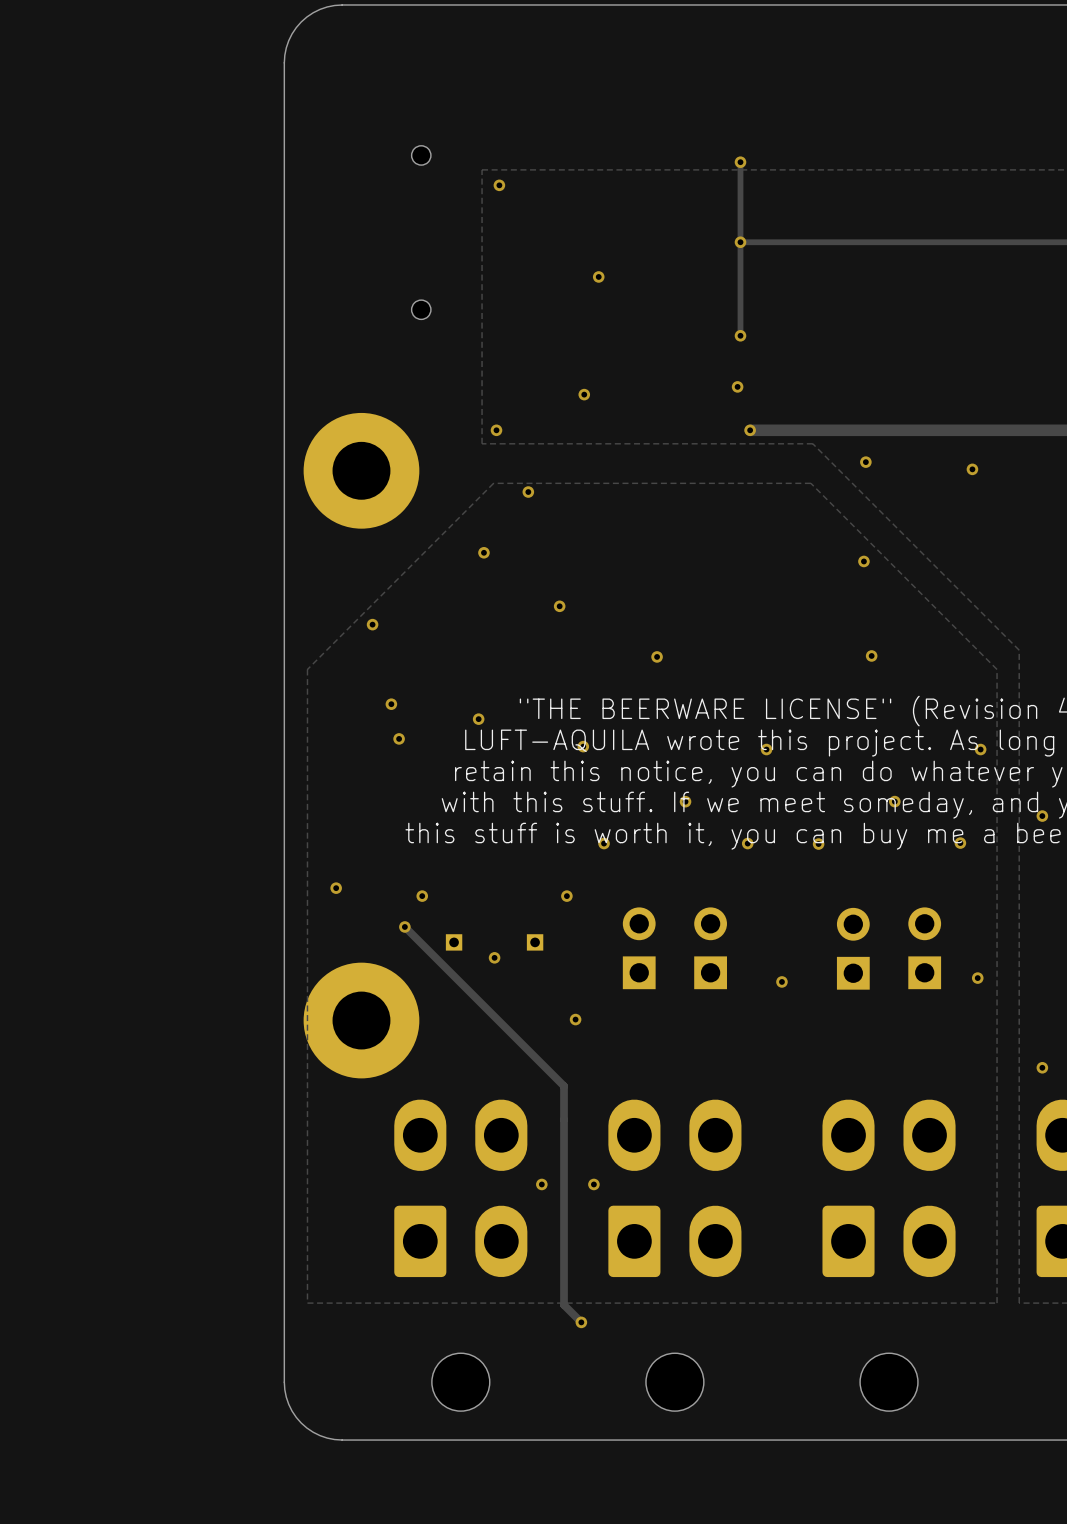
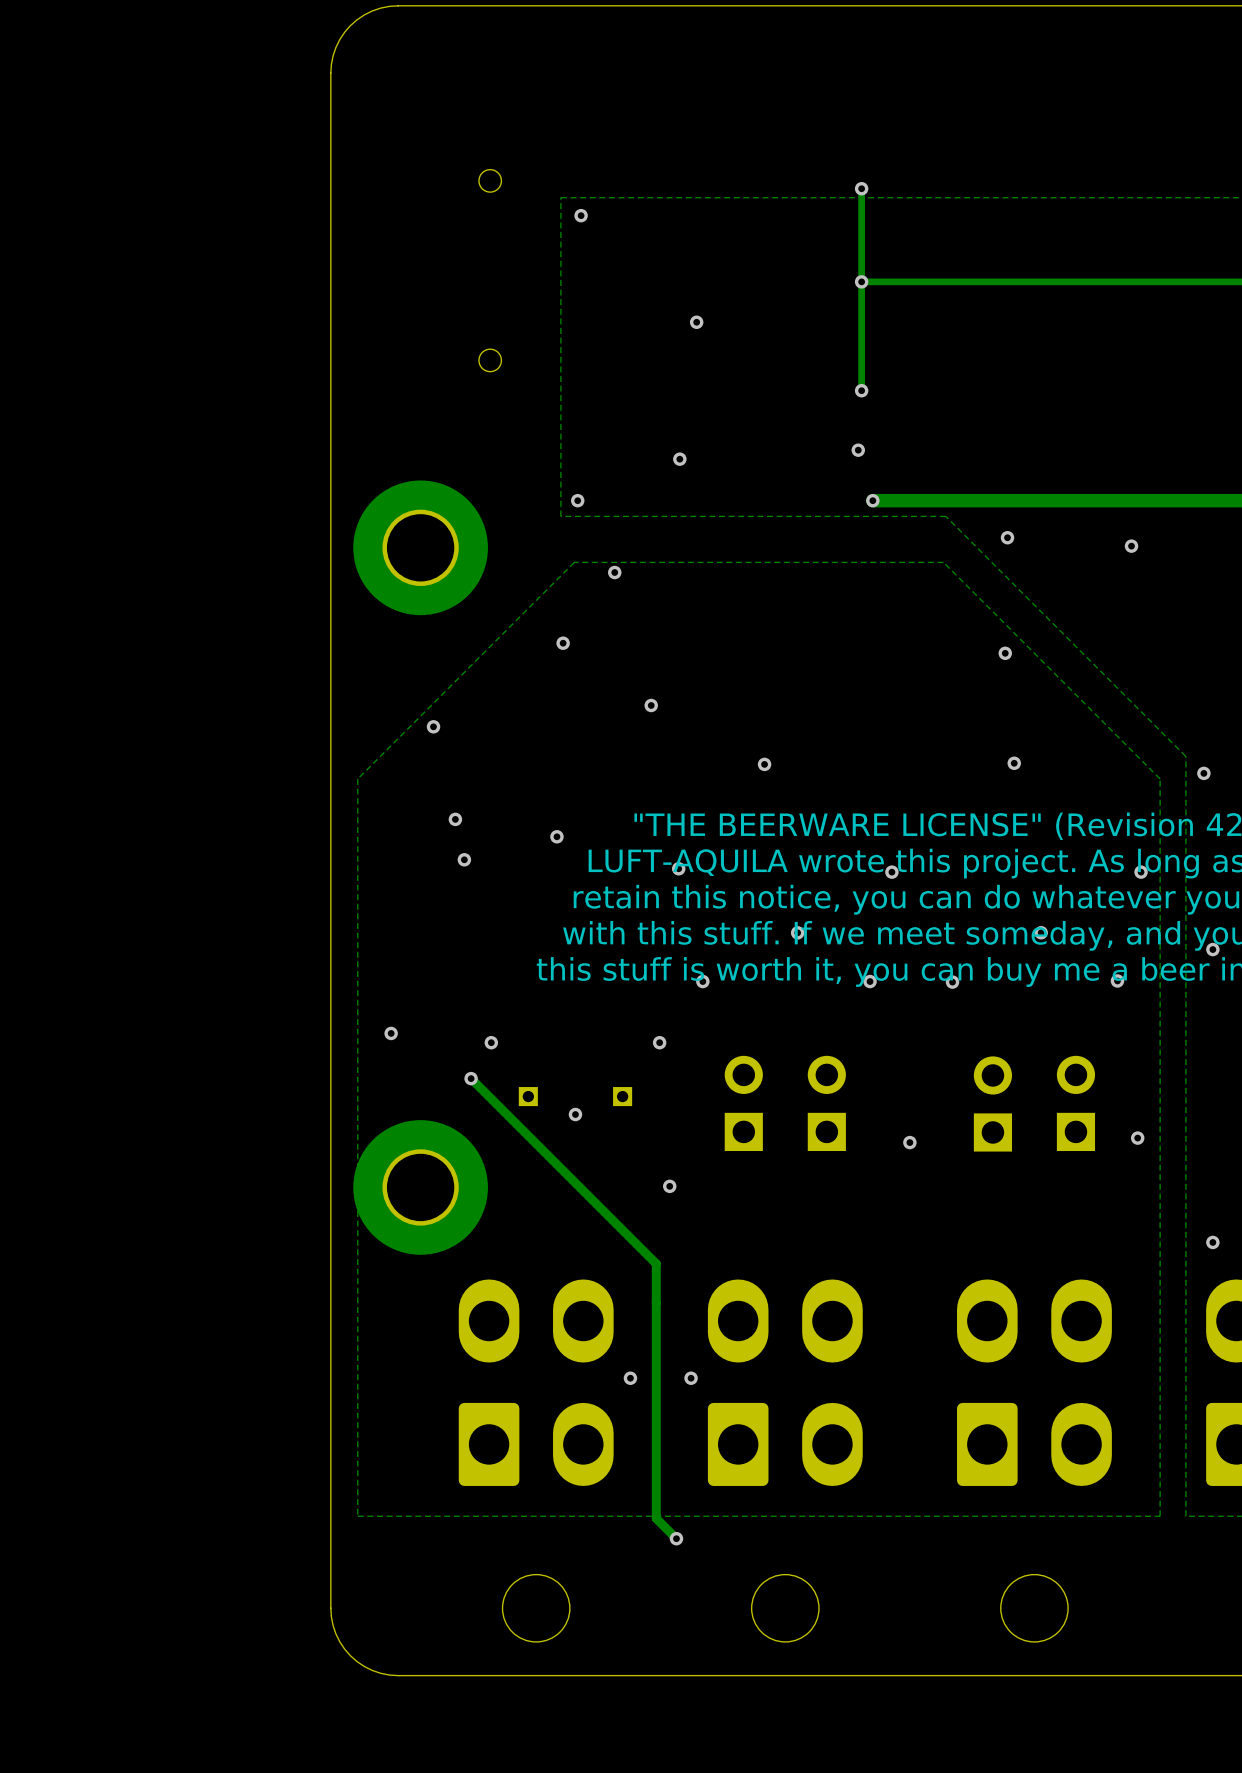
via: none -> (1203, 773)

